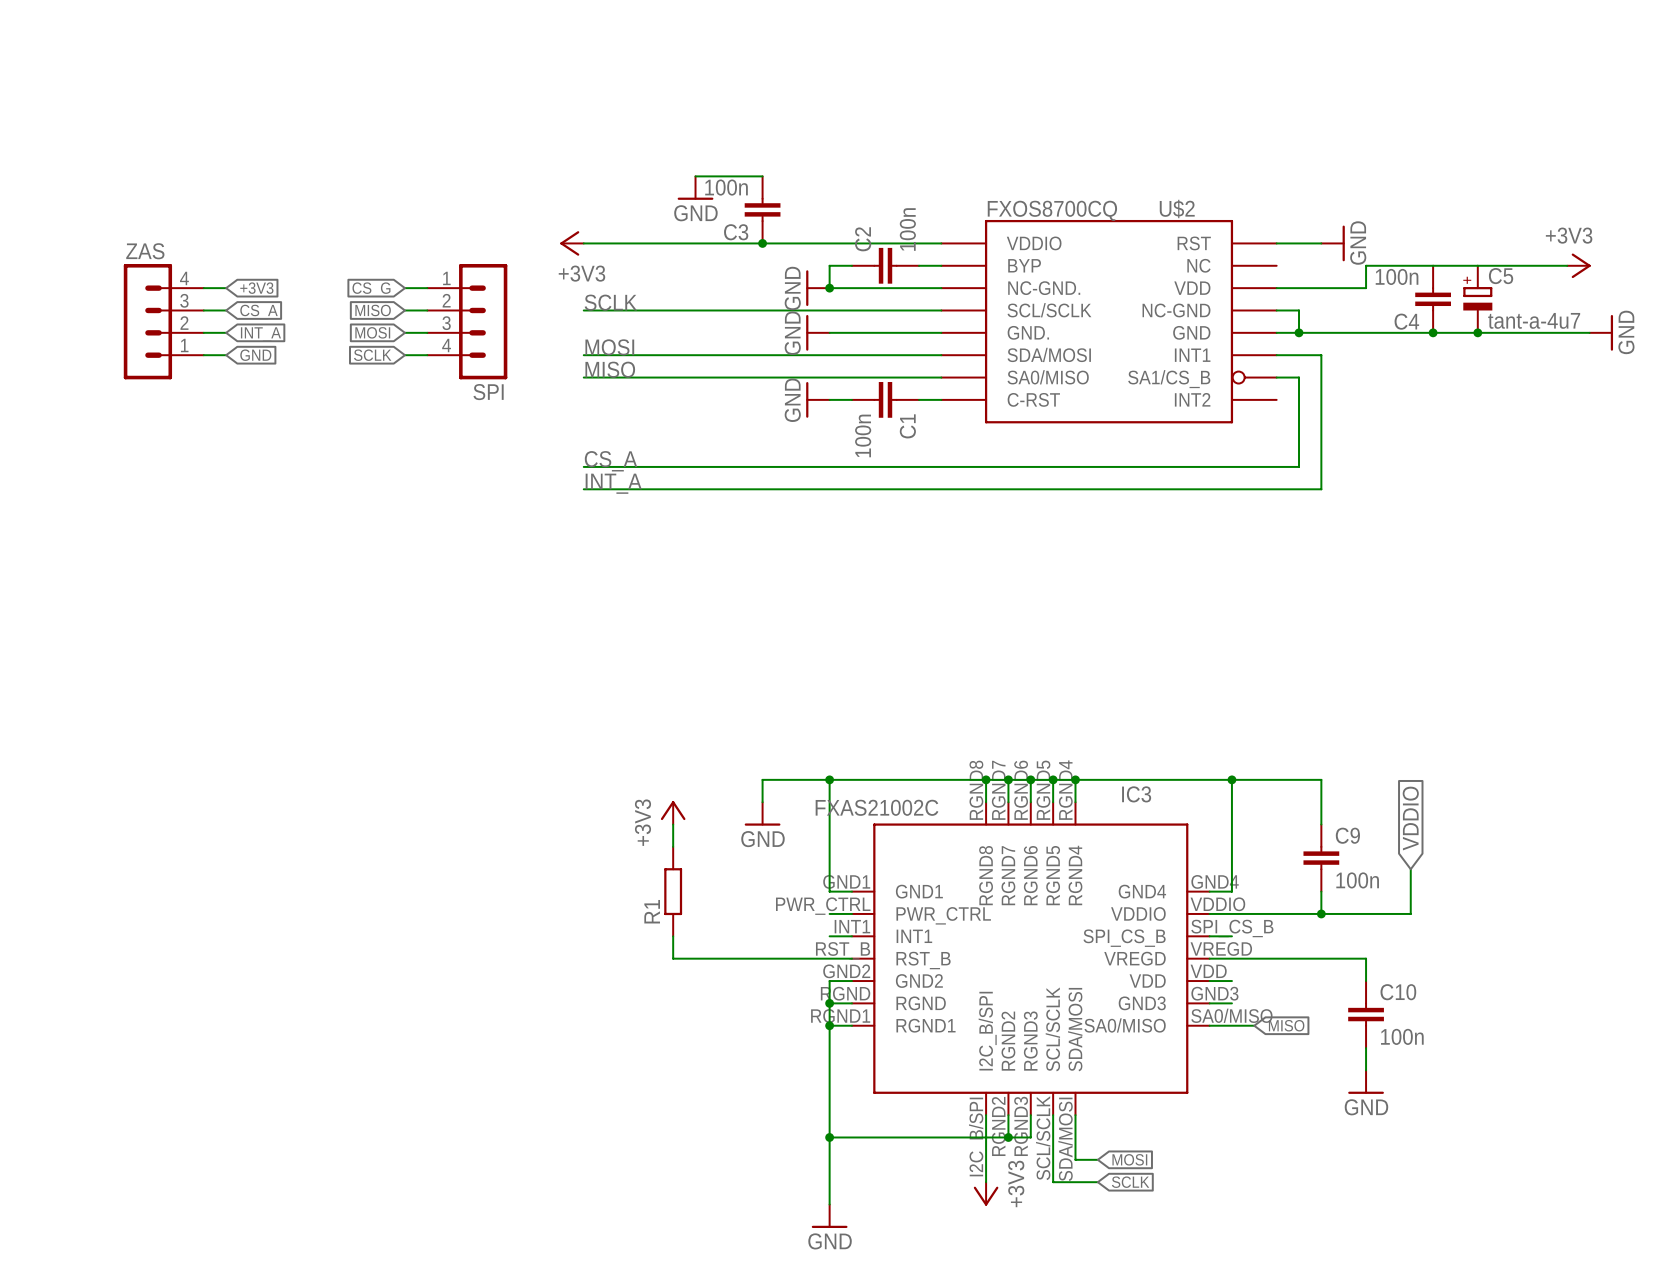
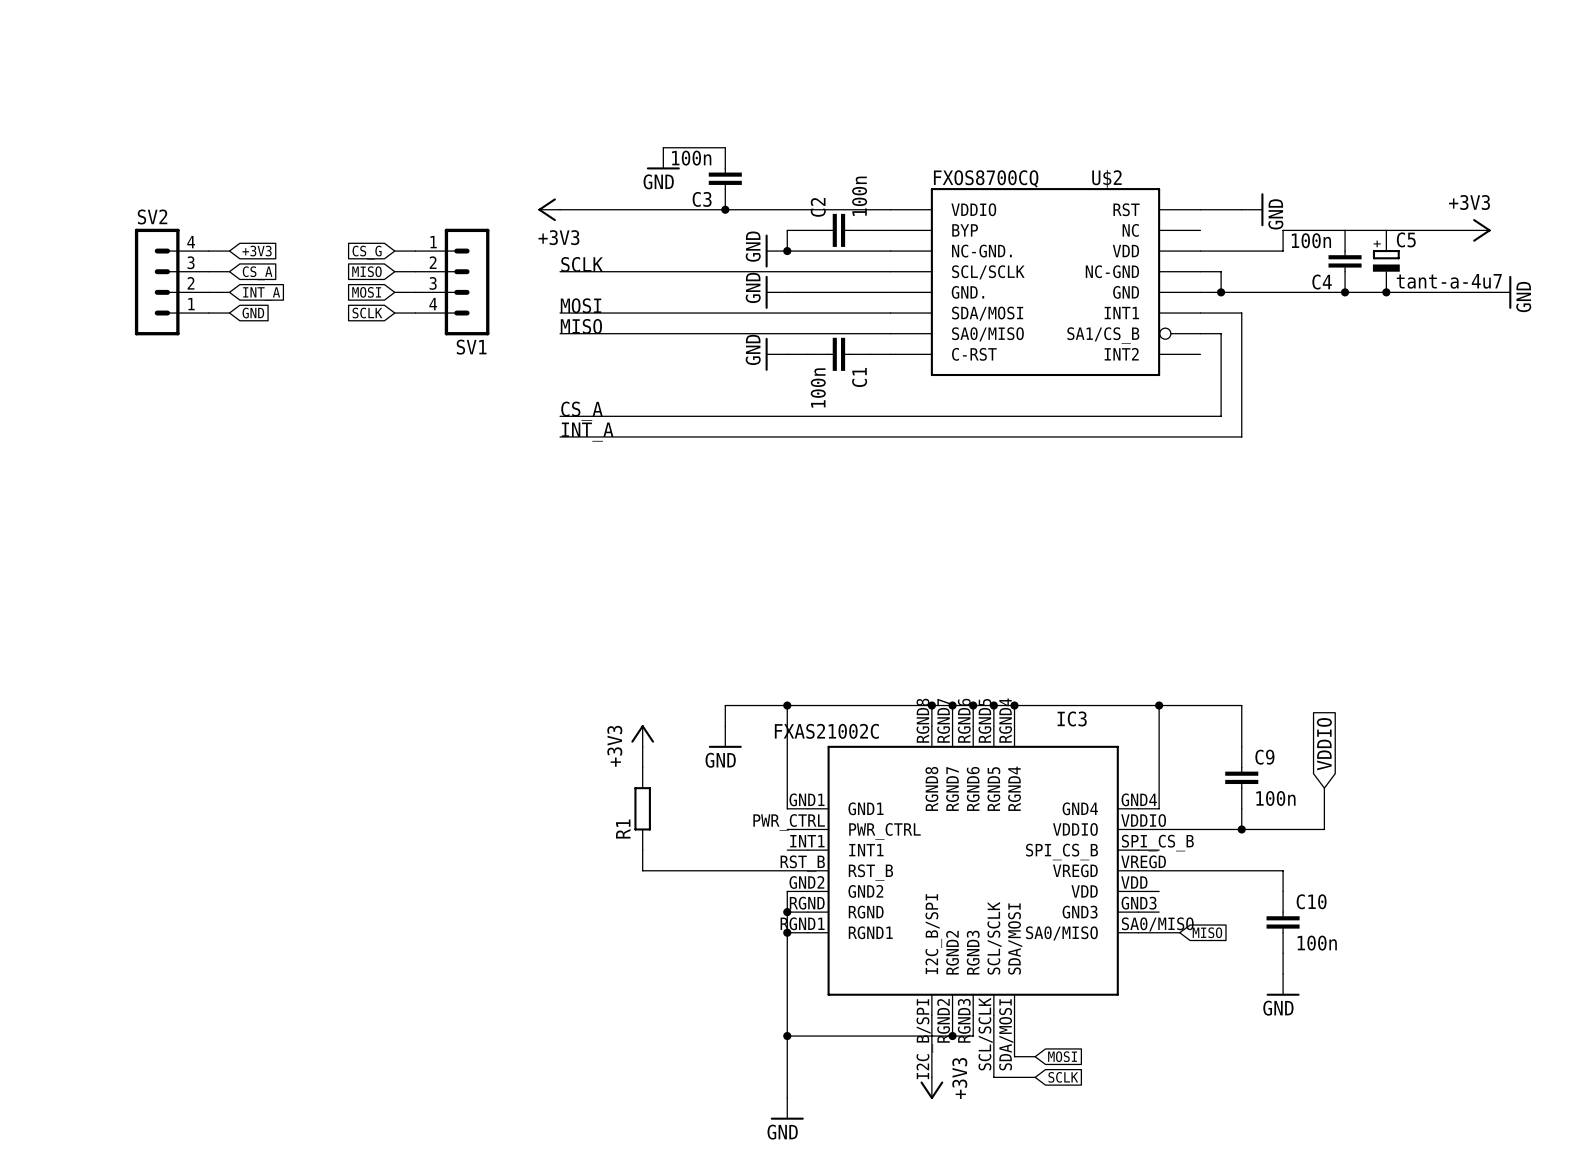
ZAS name: ZAS (145, 251) -> SV2 (152, 216)
SPI name: SPI (488, 392) -> SV1 (471, 347)

